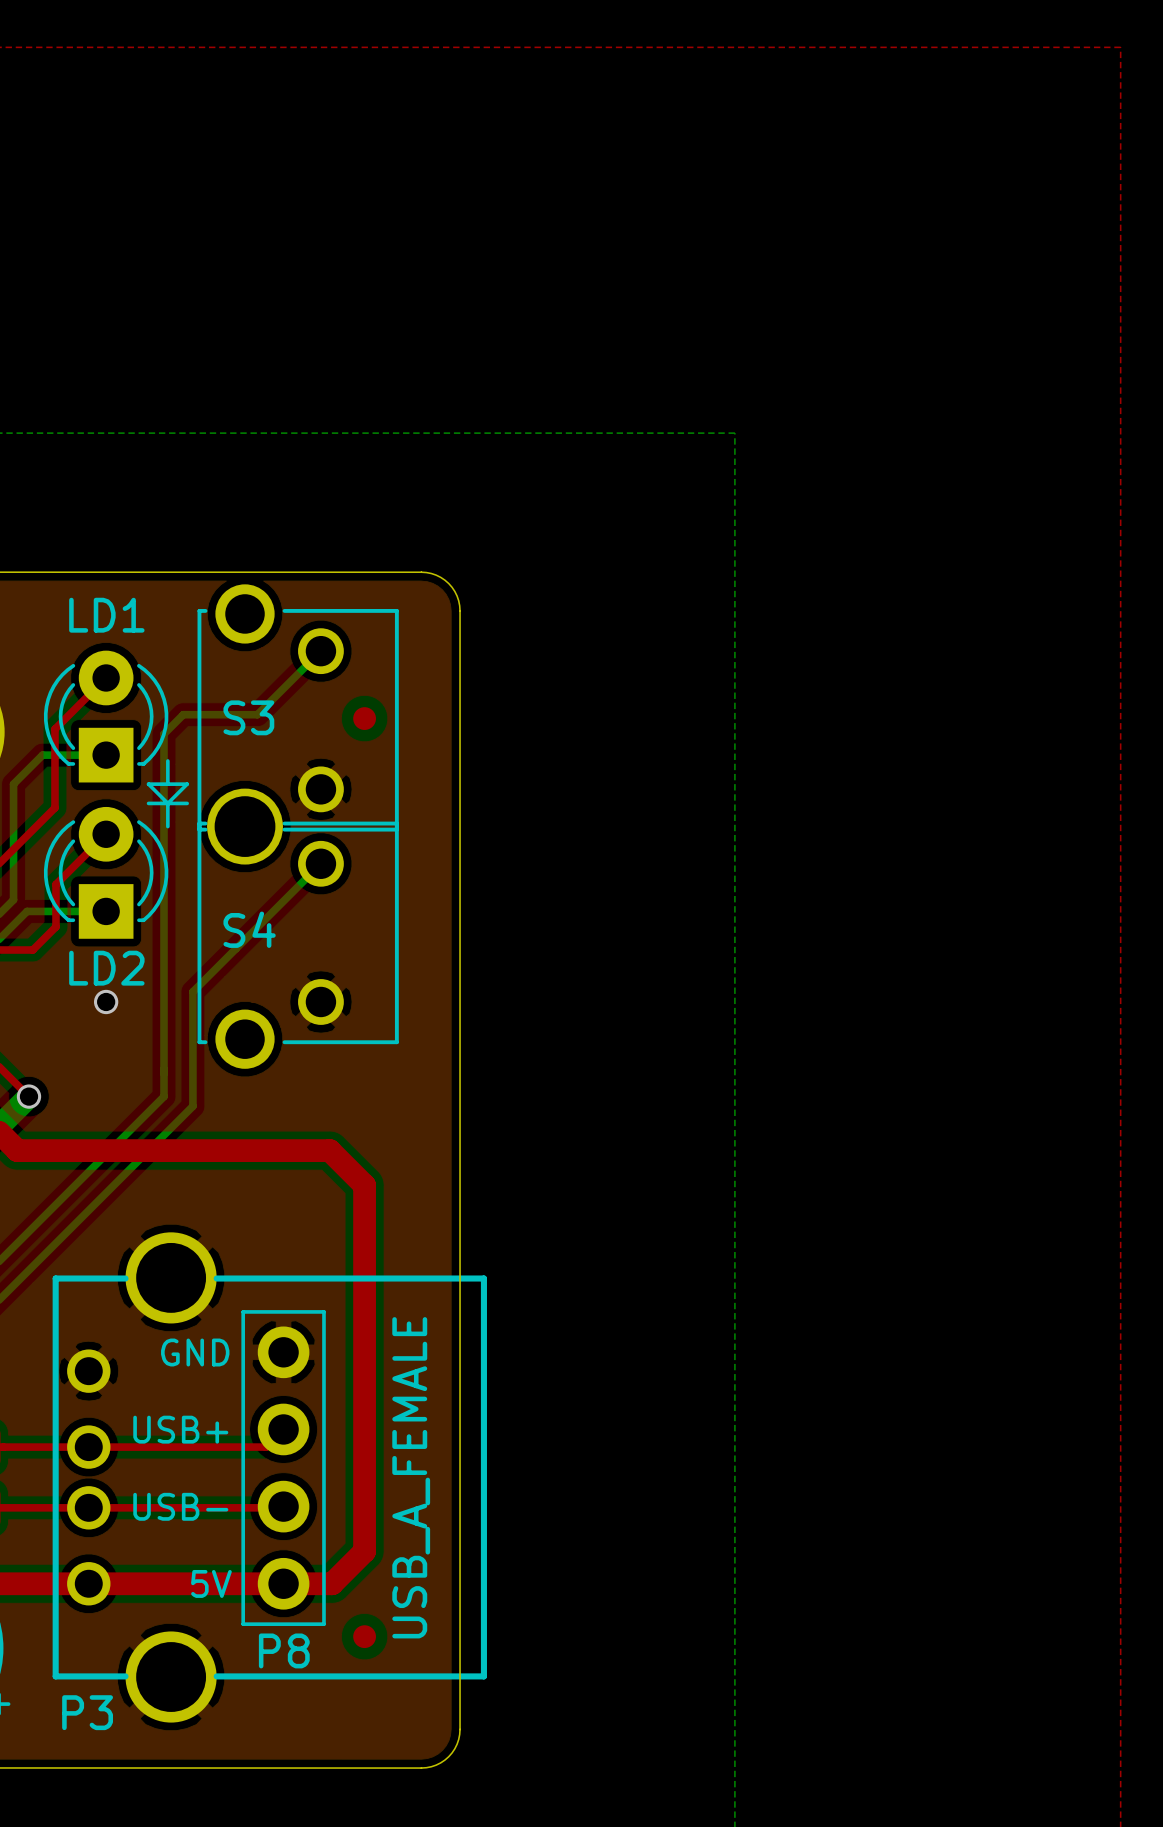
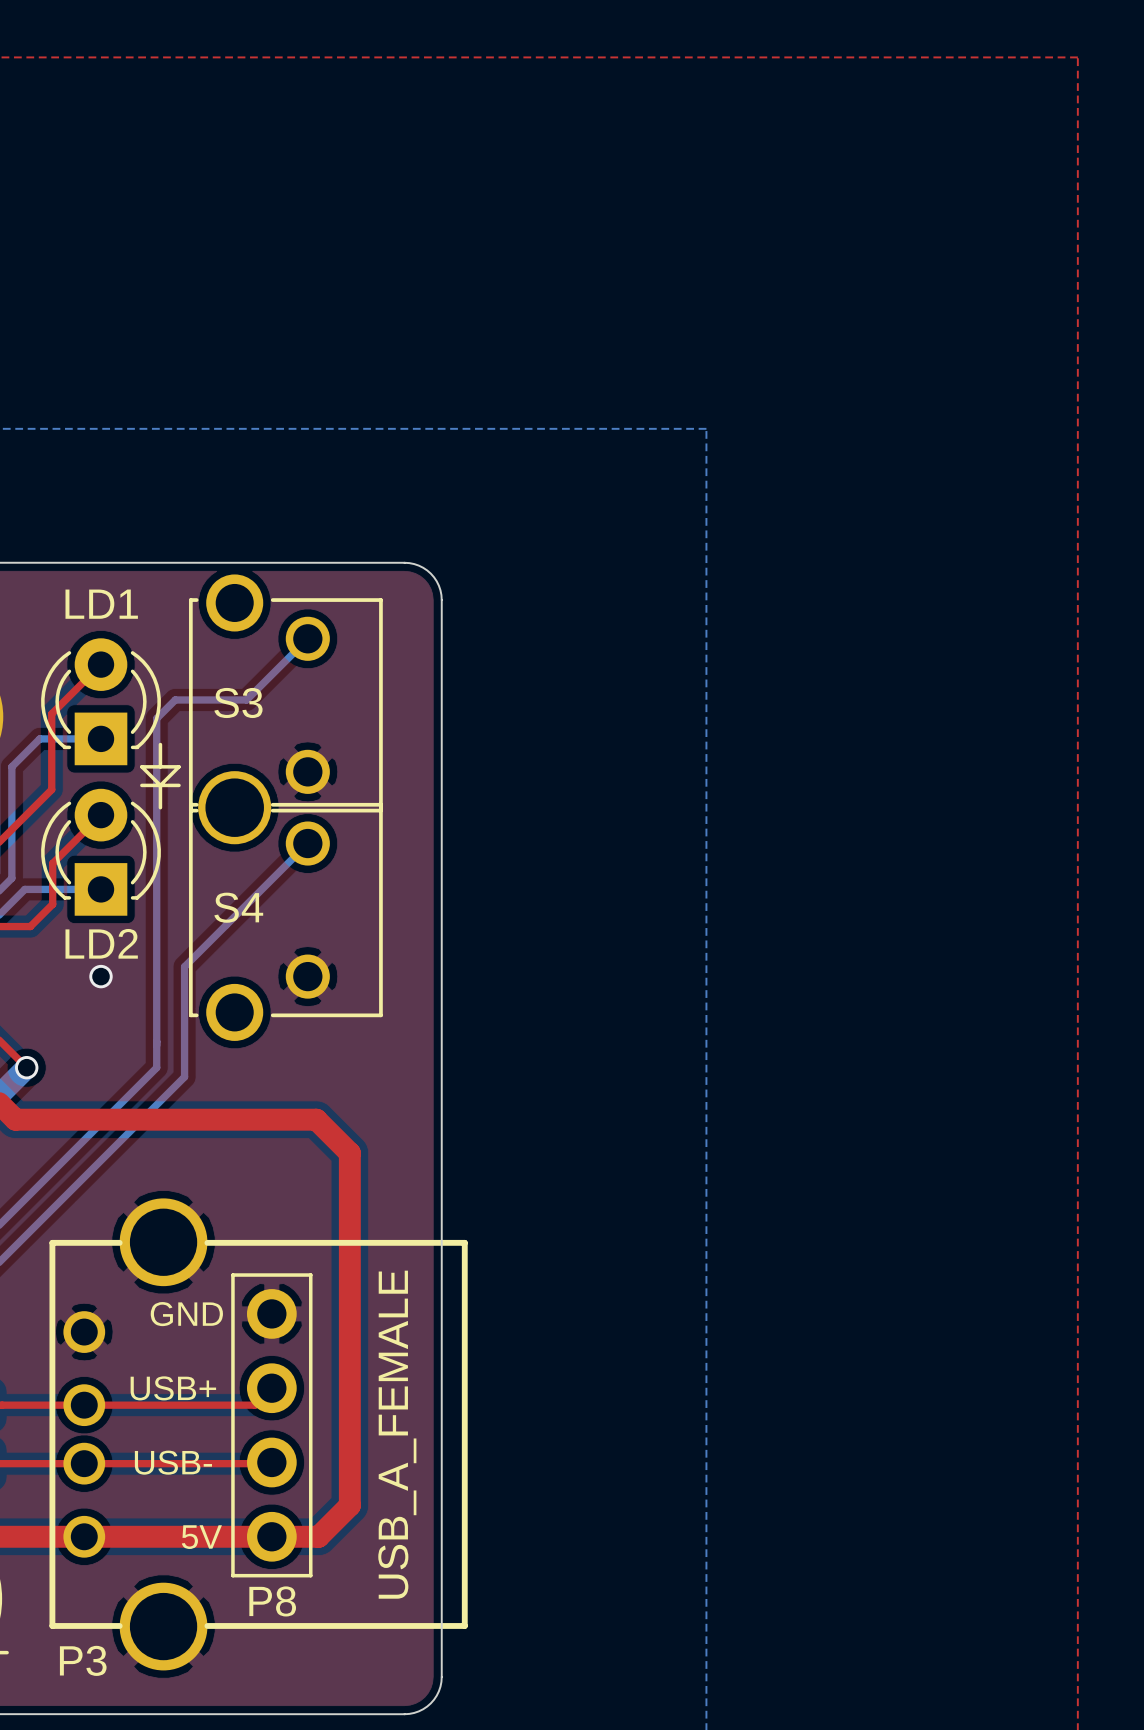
part: (364, 718) -> none
part: (364, 1636) -> none

